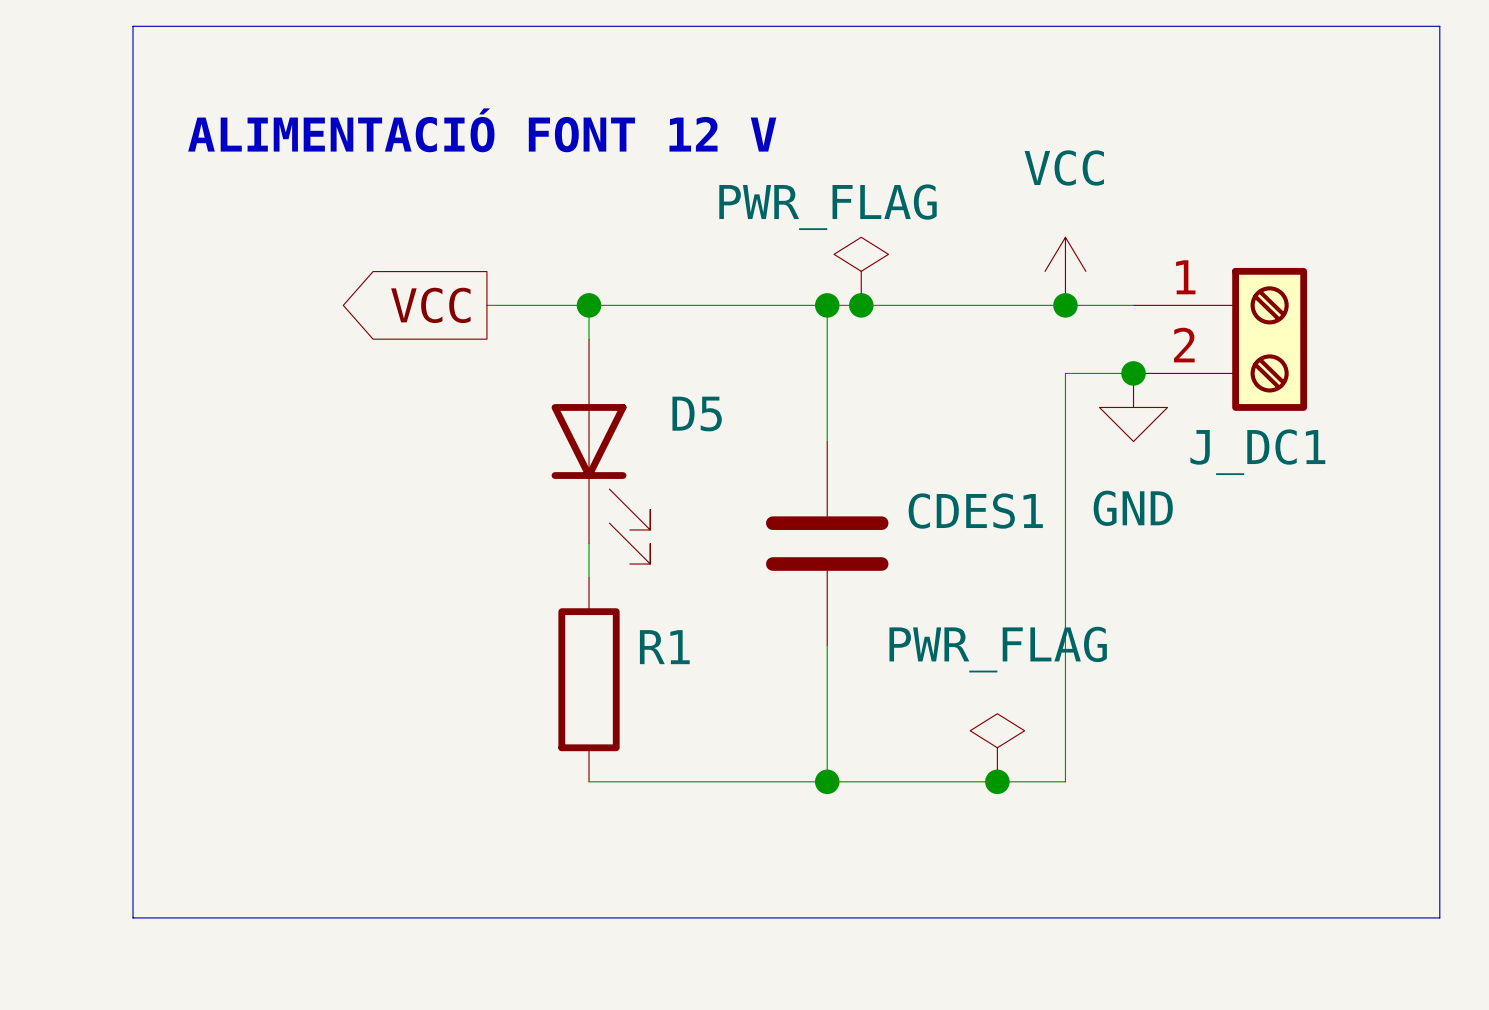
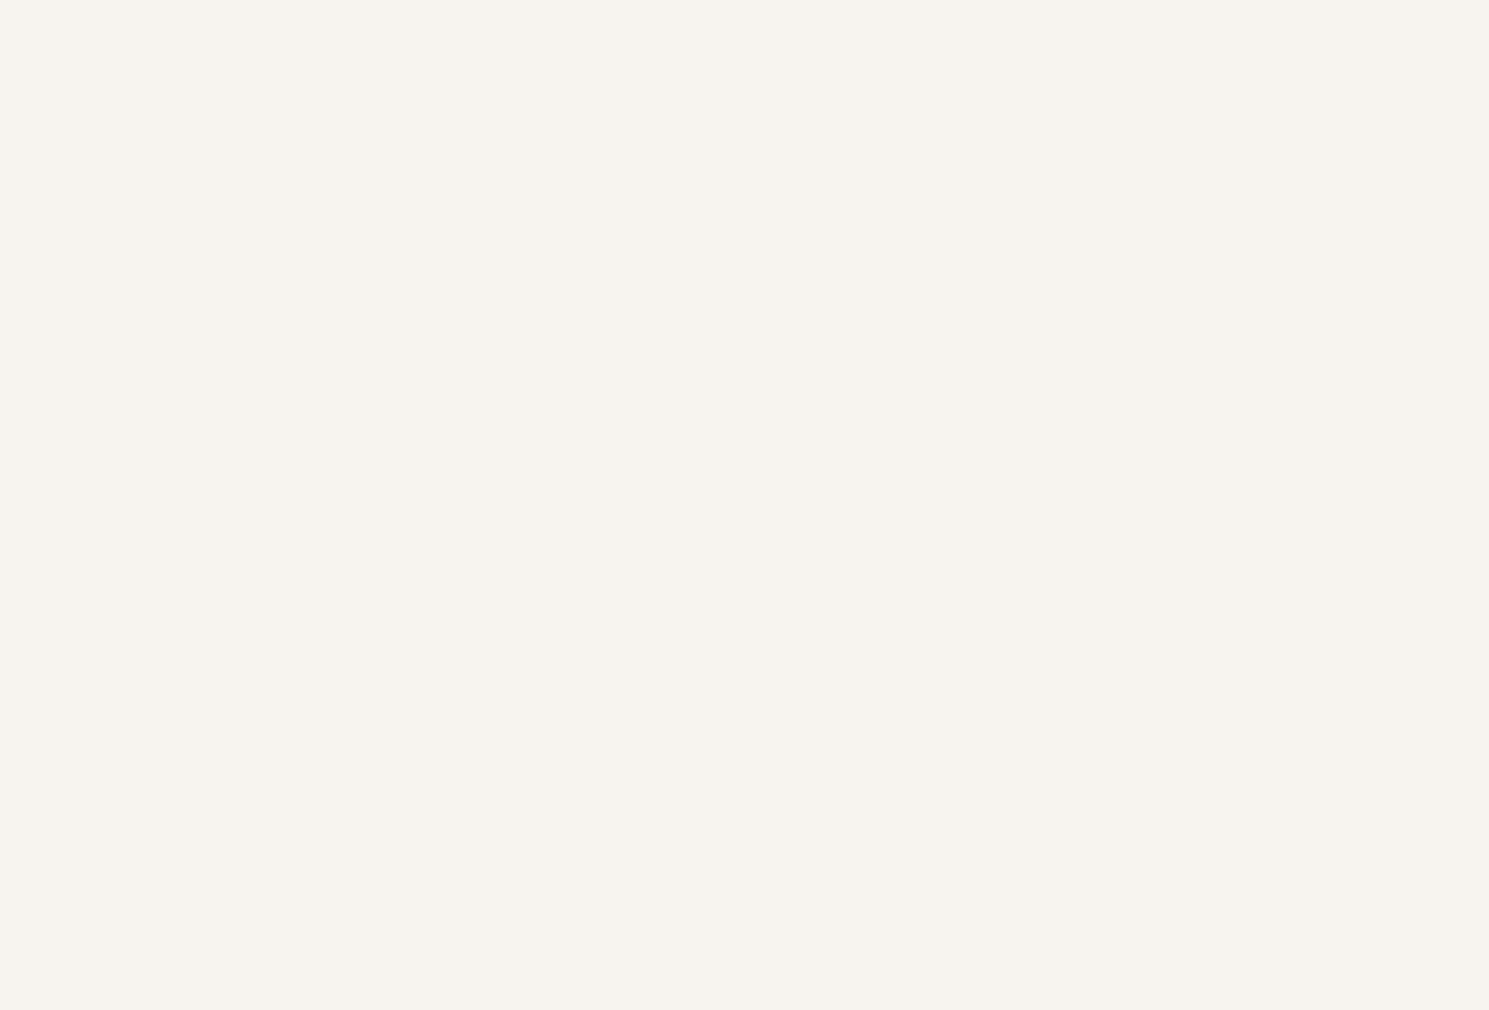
line: (133, 26) (1439, 26) (1439, 917) (133, 917) (133, 26) -> none
text: ALIMENTACIÓ FONT 12 V (482, 130) -> none
power symbol: PWR_FLAG (861, 271) -> none
power symbol: VCC (1065, 271) -> none
global label: VCC (430, 305) -> none
wire: (486, 305) (1133, 305) -> none
wire: (589, 305) (589, 339) -> none
junction: (589, 305) -> none
wire: (827, 305) (827, 441) -> none
junction: (827, 305) -> none
junction: (861, 305) -> none
junction: (1065, 305) -> none
J_DC1: (1220, 339) -> none
wire: (1133, 373) (1065, 373) (1065, 781) (589, 781) -> none
junction: (1133, 373) -> none
power symbol: GND (1133, 407) -> none
D5: (600, 451) -> none
wire: (589, 543) (589, 577) -> none
CDES1: (827, 543) -> none
wire: (827, 645) (827, 781) -> none
R1: (589, 679) -> none
power symbol: PWR_FLAG (997, 747) -> none
junction: (827, 781) -> none
junction: (997, 781) -> none

